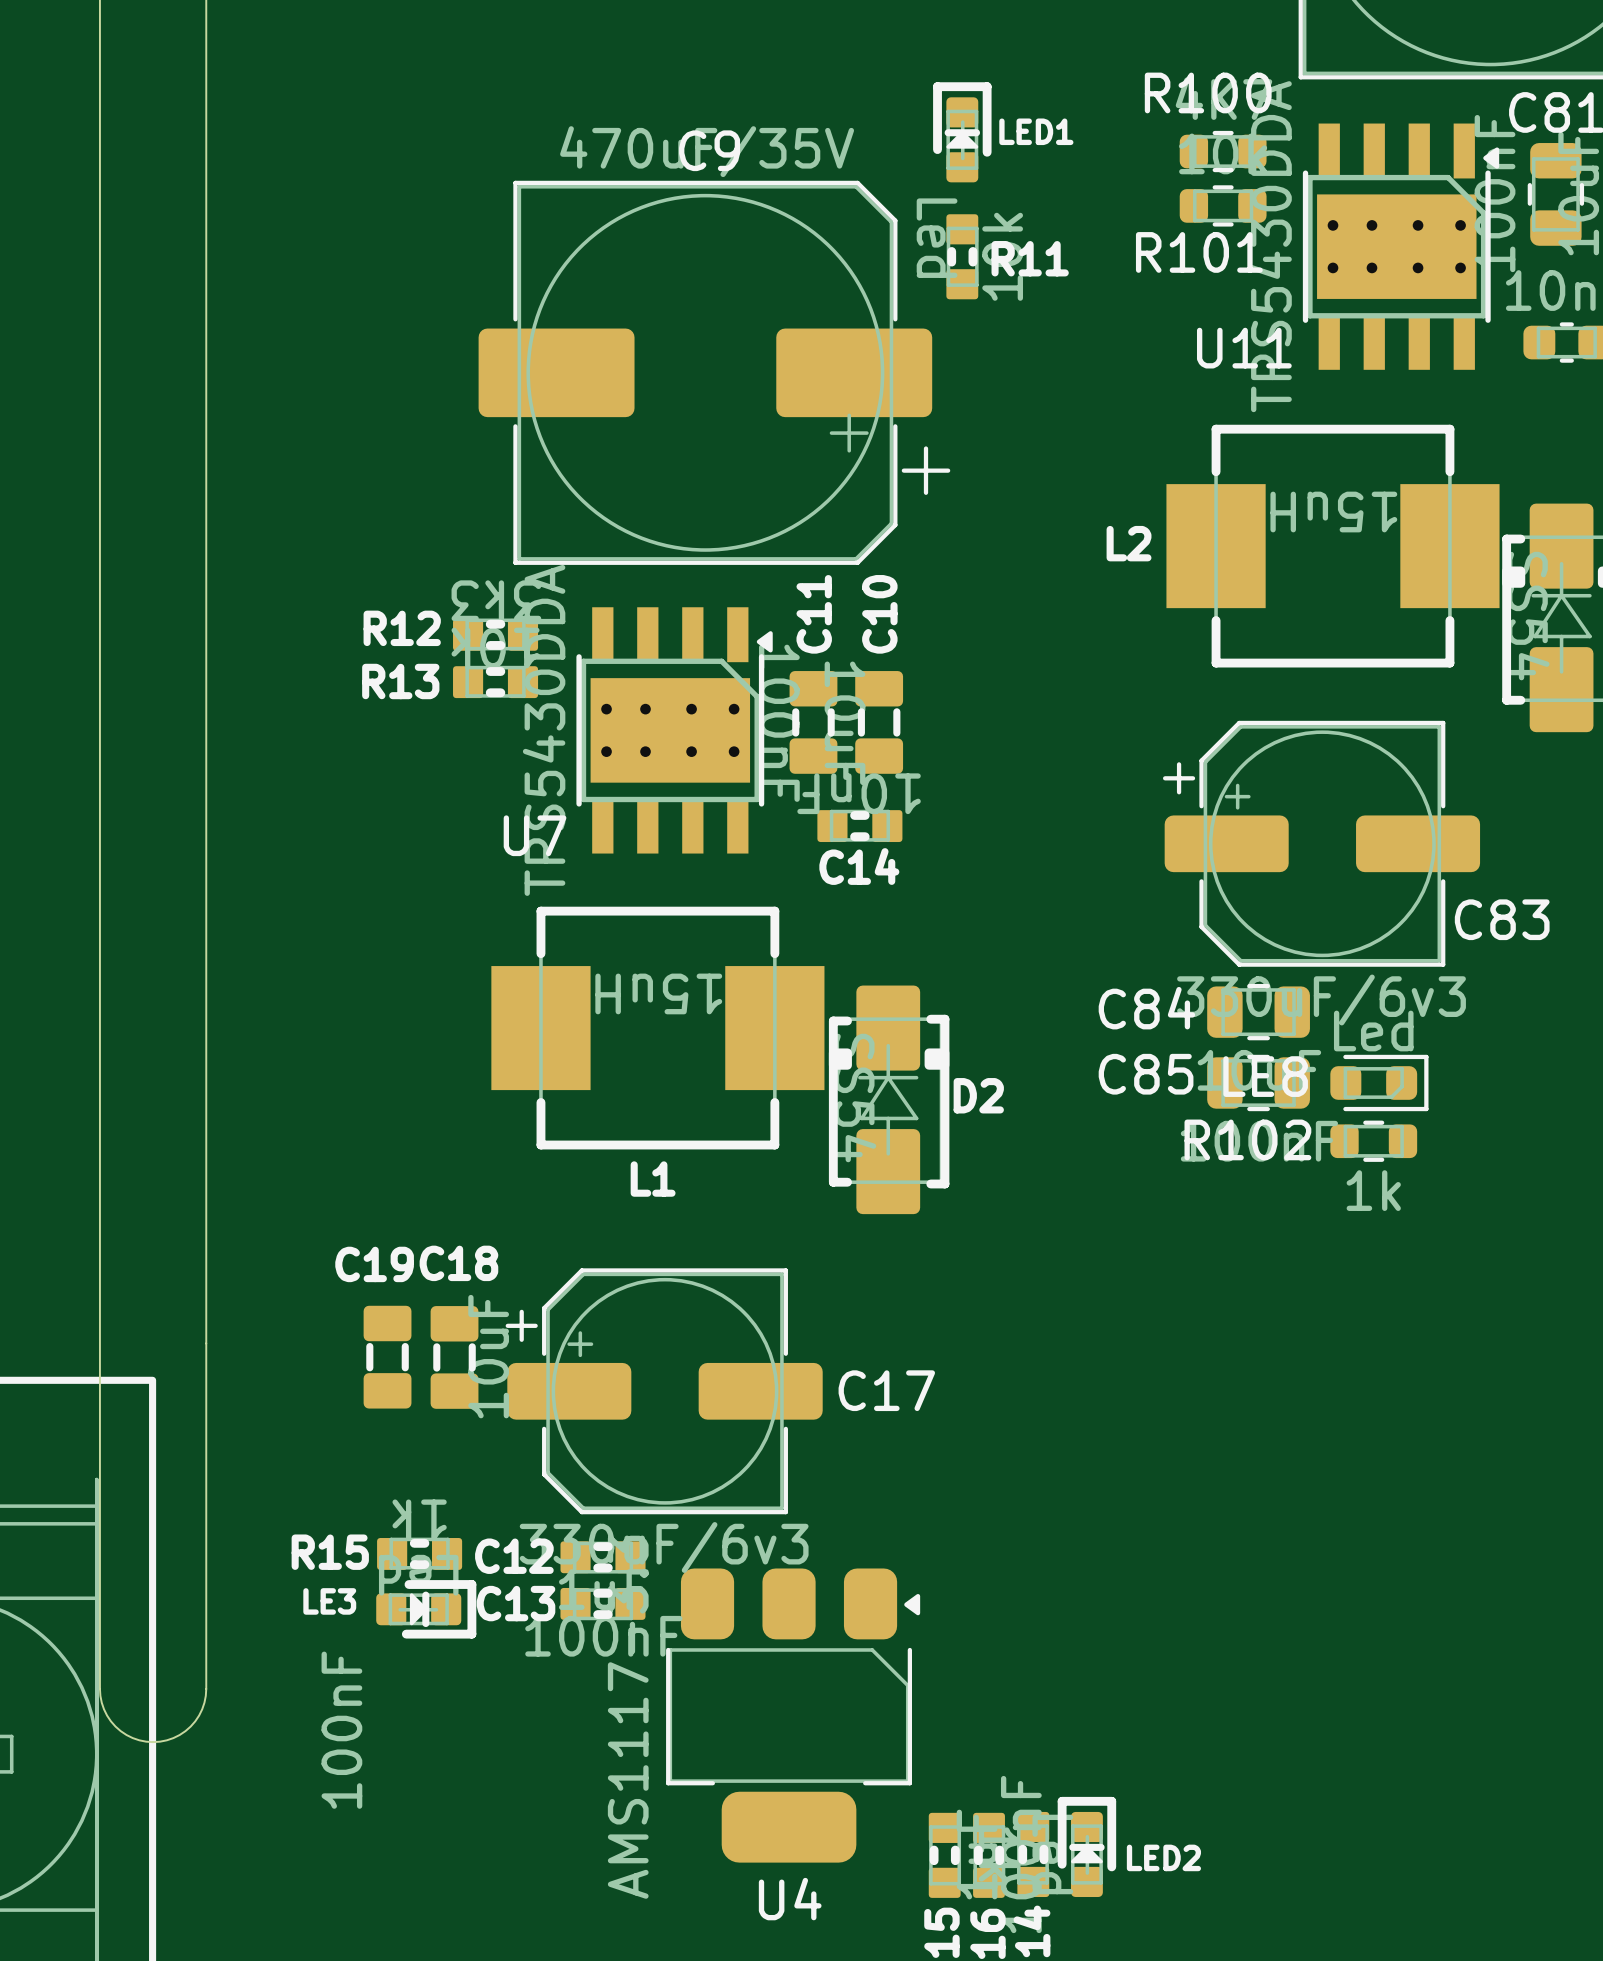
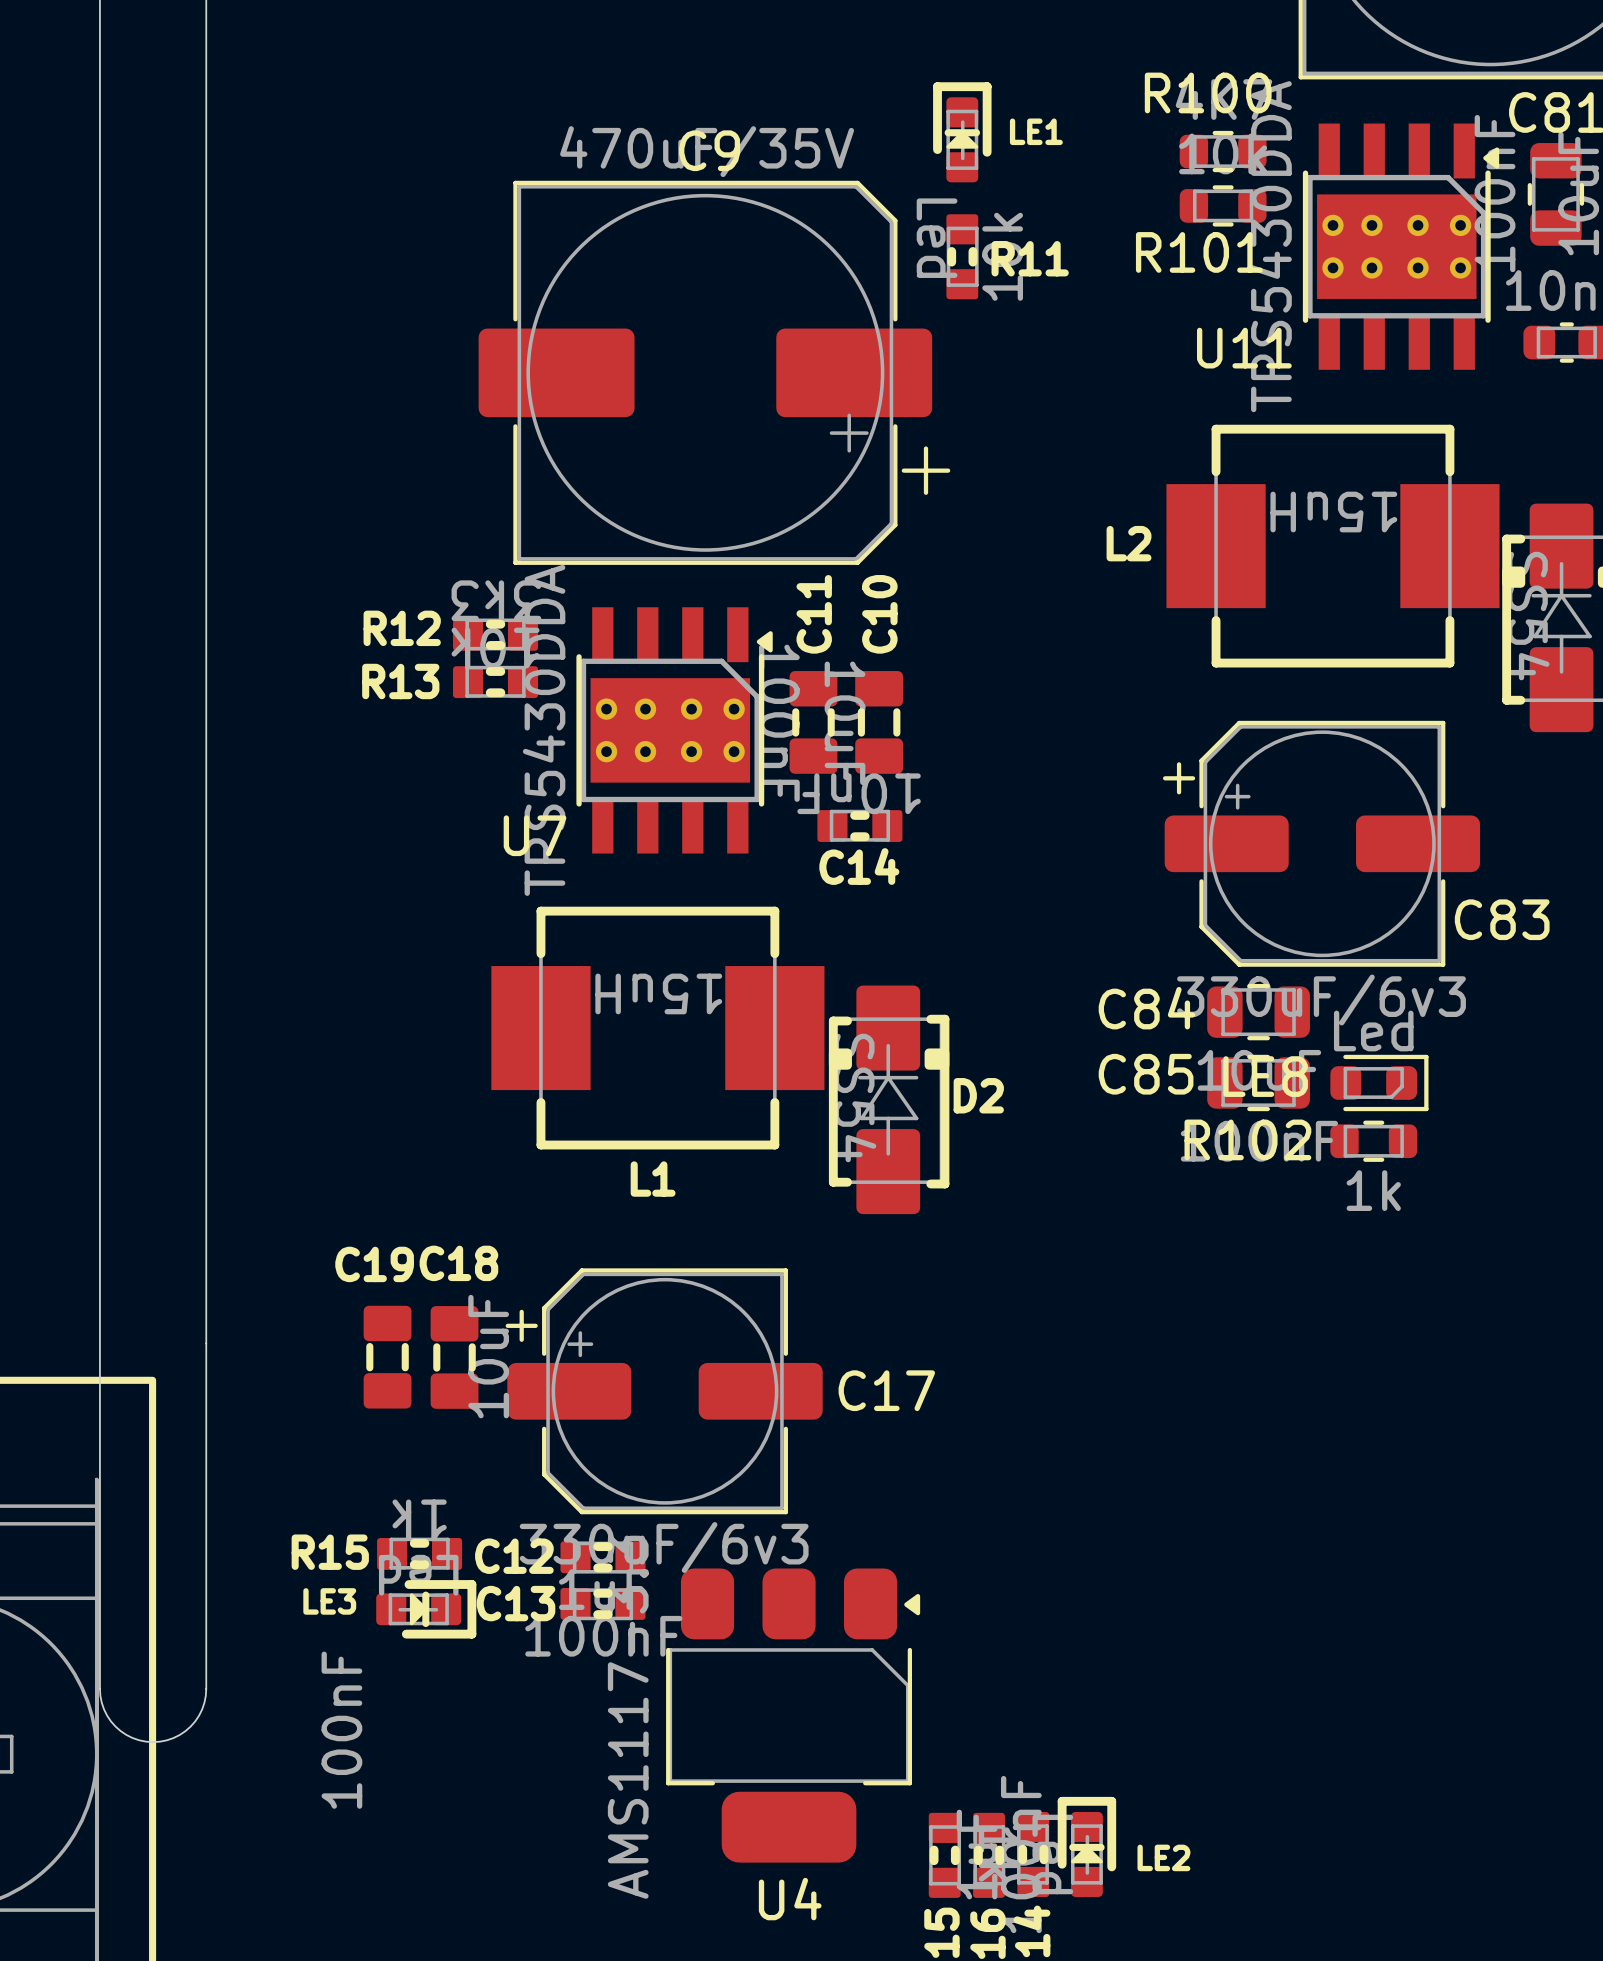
LED1 name: LED1 (1036, 131) -> LE1 (1036, 131)
LED2 name: LED2 (1163, 1857) -> LE2 (1163, 1857)

